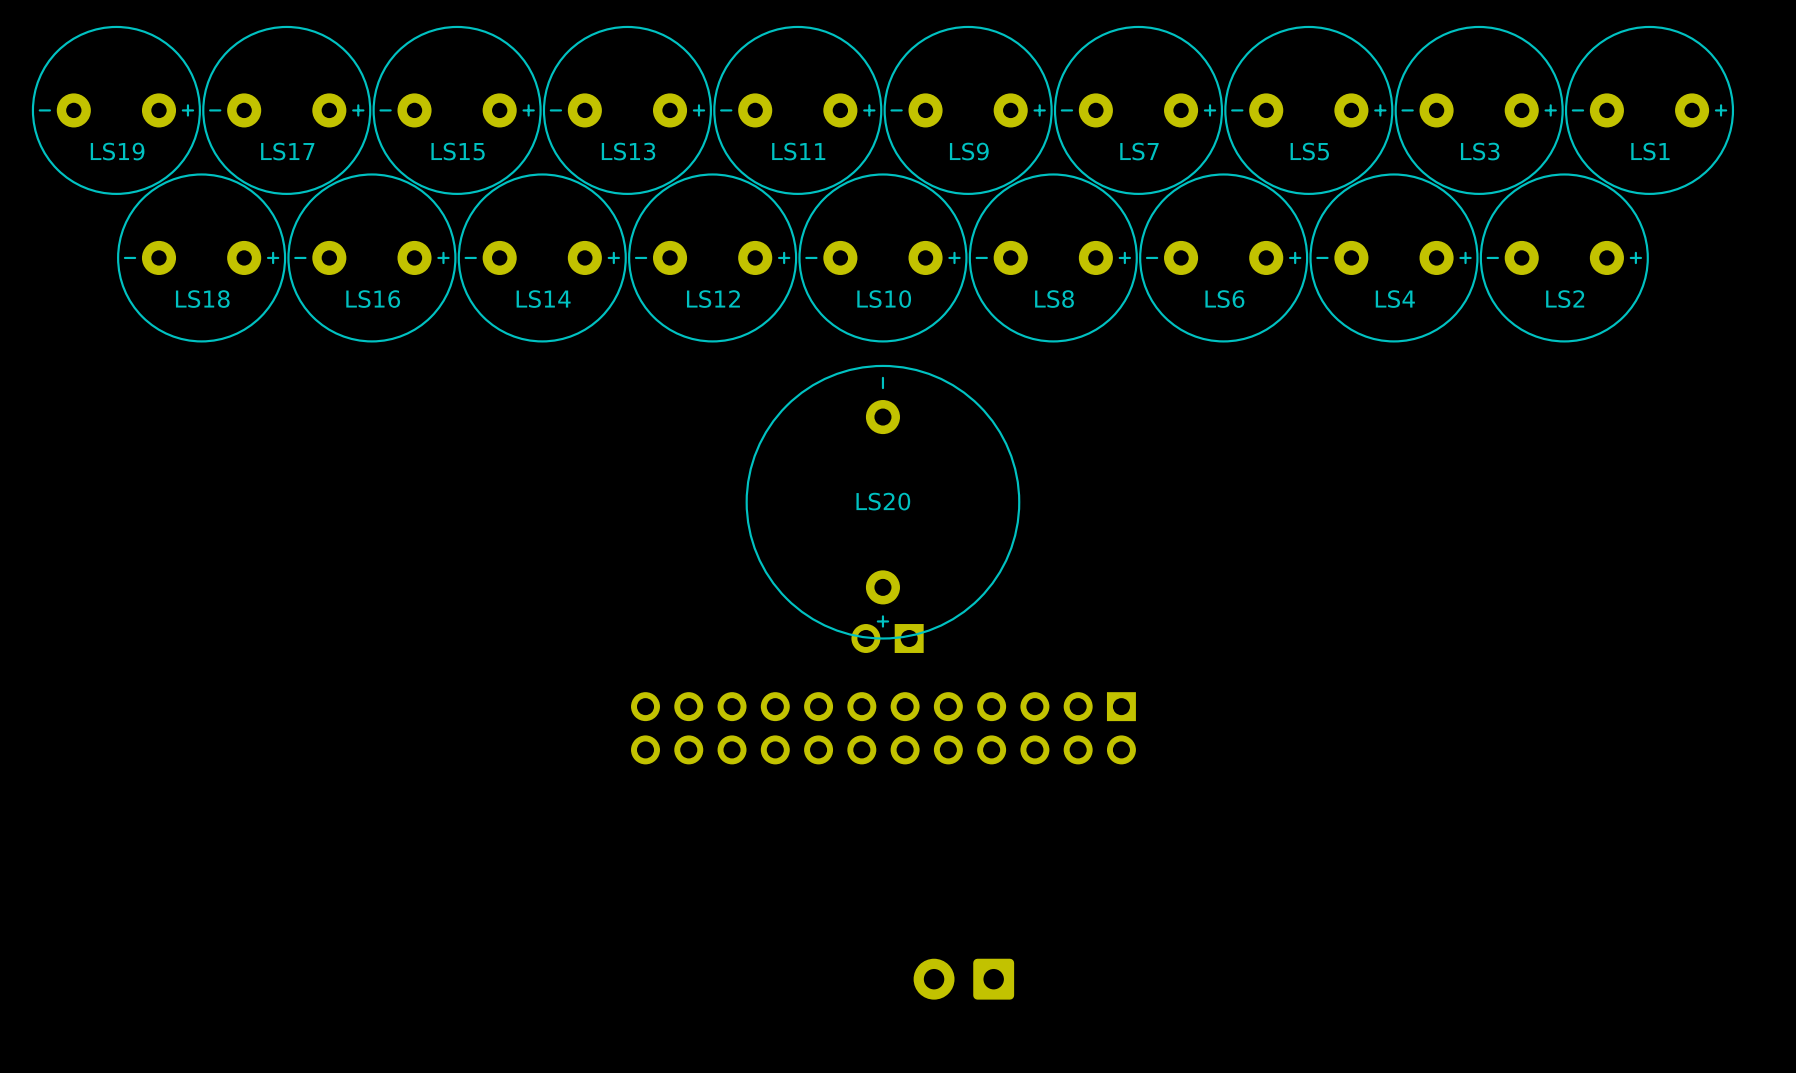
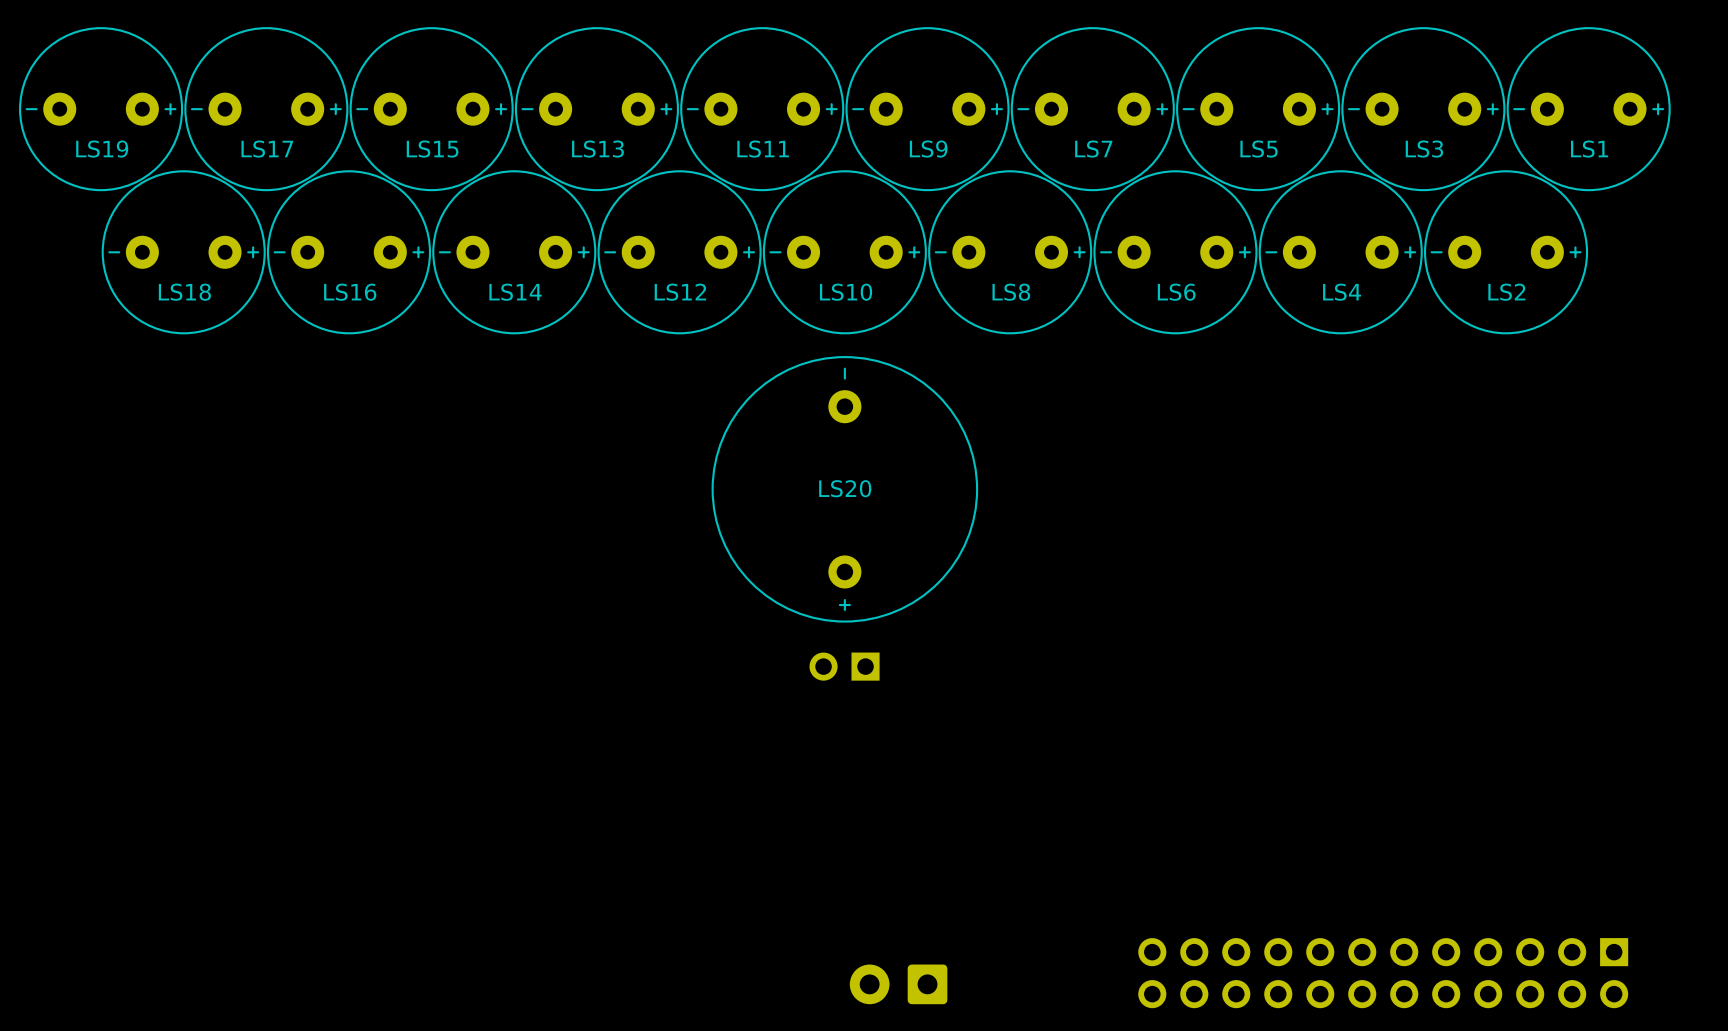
part position: (887, 638) -> (844, 666)
part: (883, 728) -> none
part position: (963, 979) -> (898, 984)
part: none -> (1383, 973)

